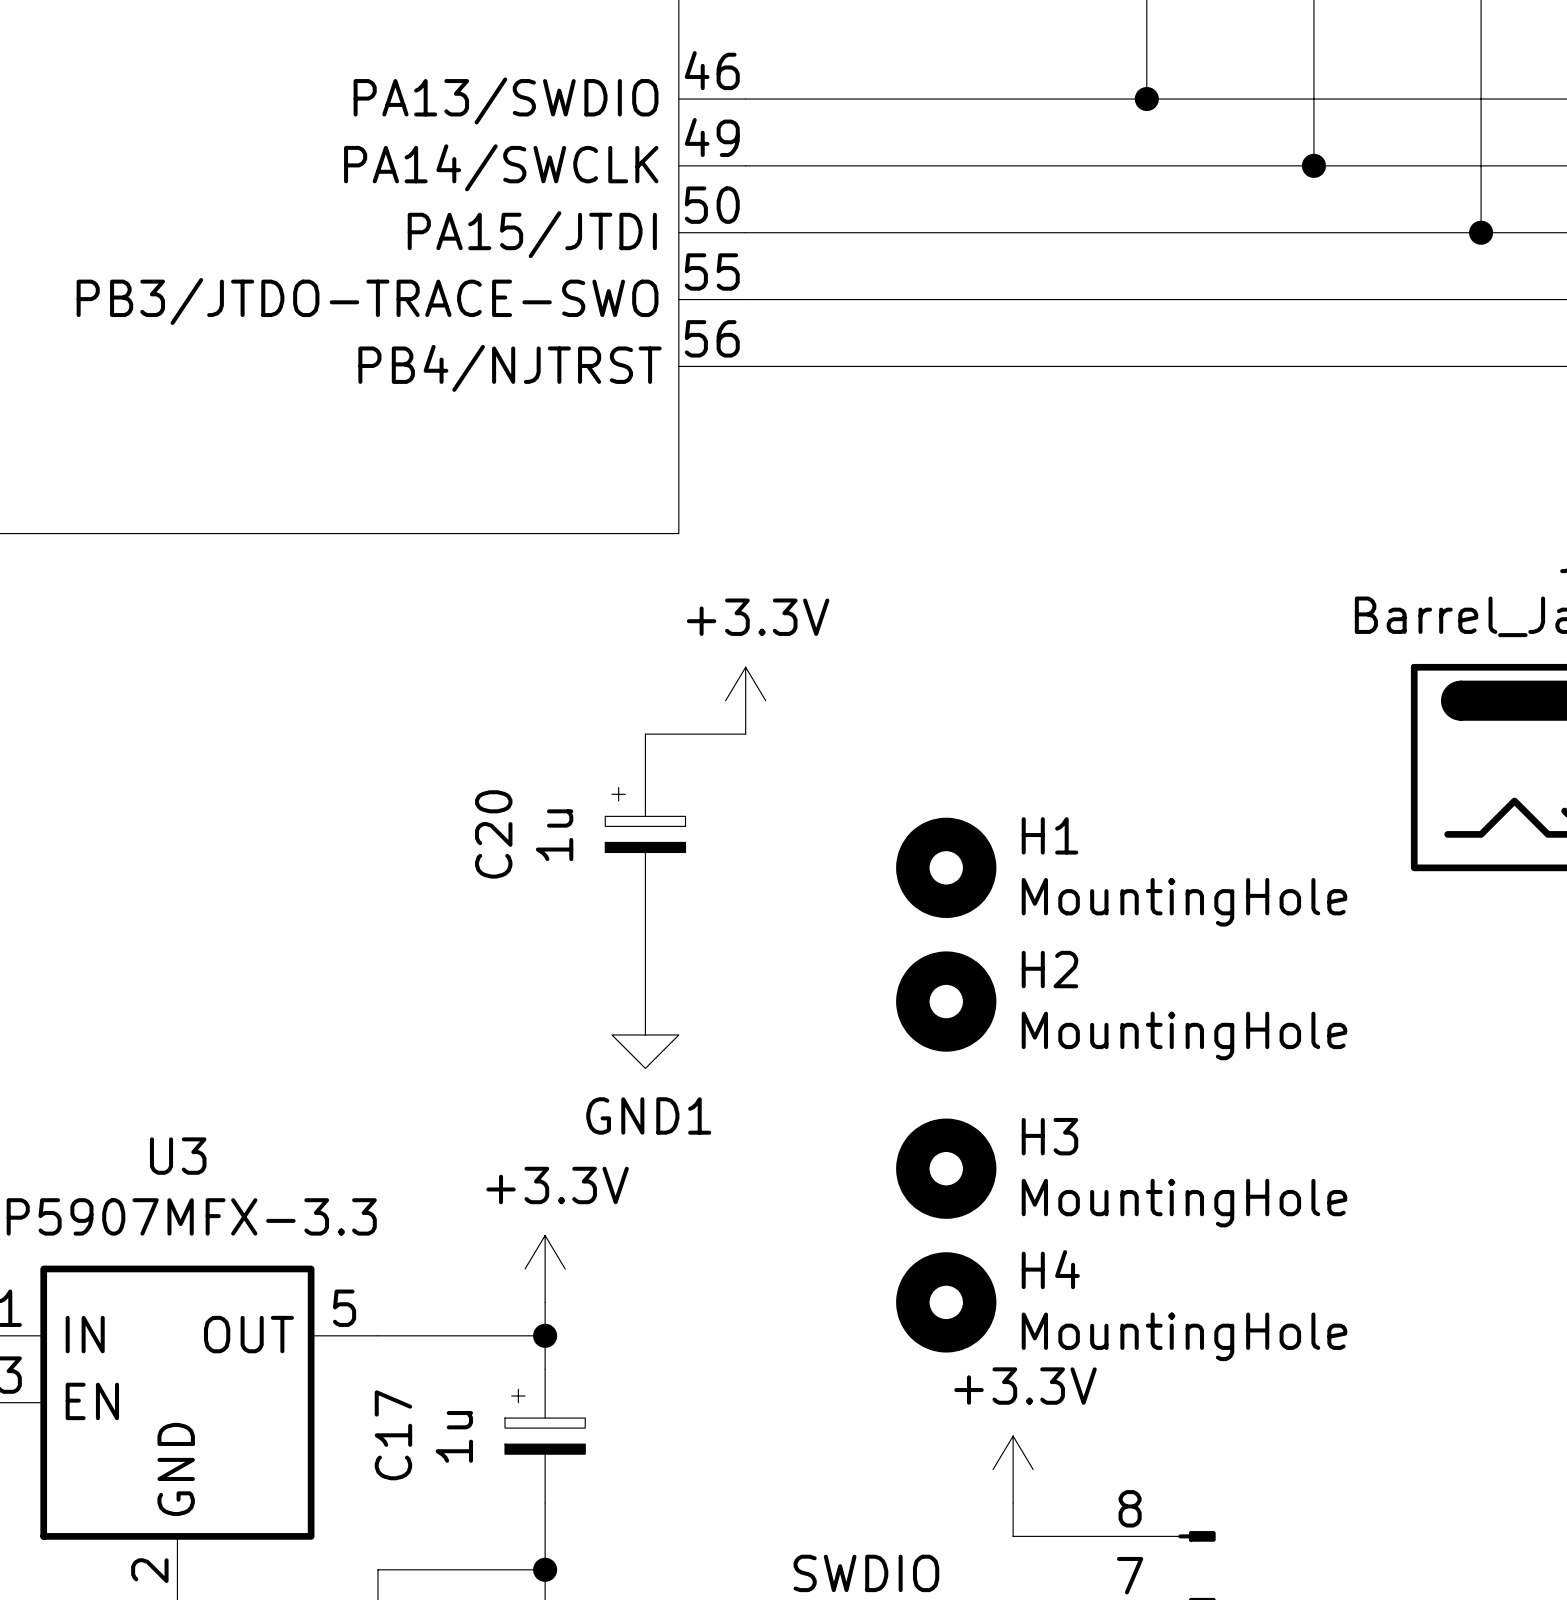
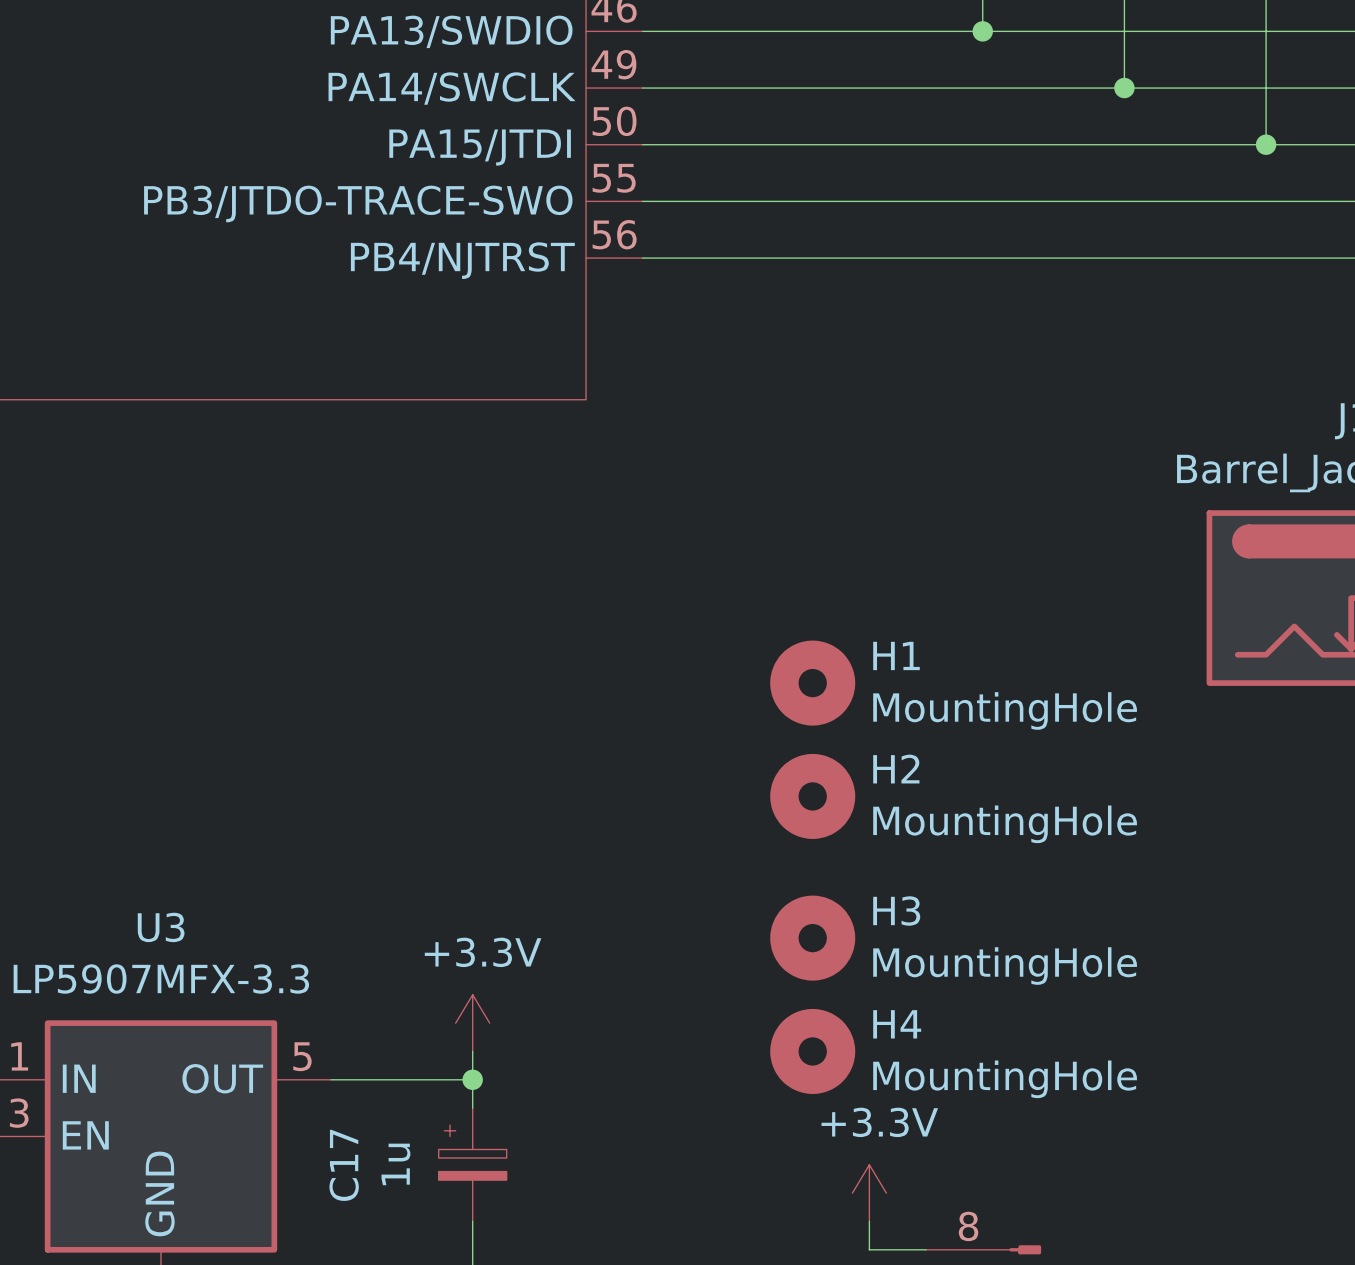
power symbol: +3.3V (745, 700) -> none
wire: (745, 734) (645, 734) (645, 767) -> none
C20: 1u (645, 834) -> none
wire: (645, 901) (645, 1001) -> none
power symbol: GND1 (645, 1034) -> none

